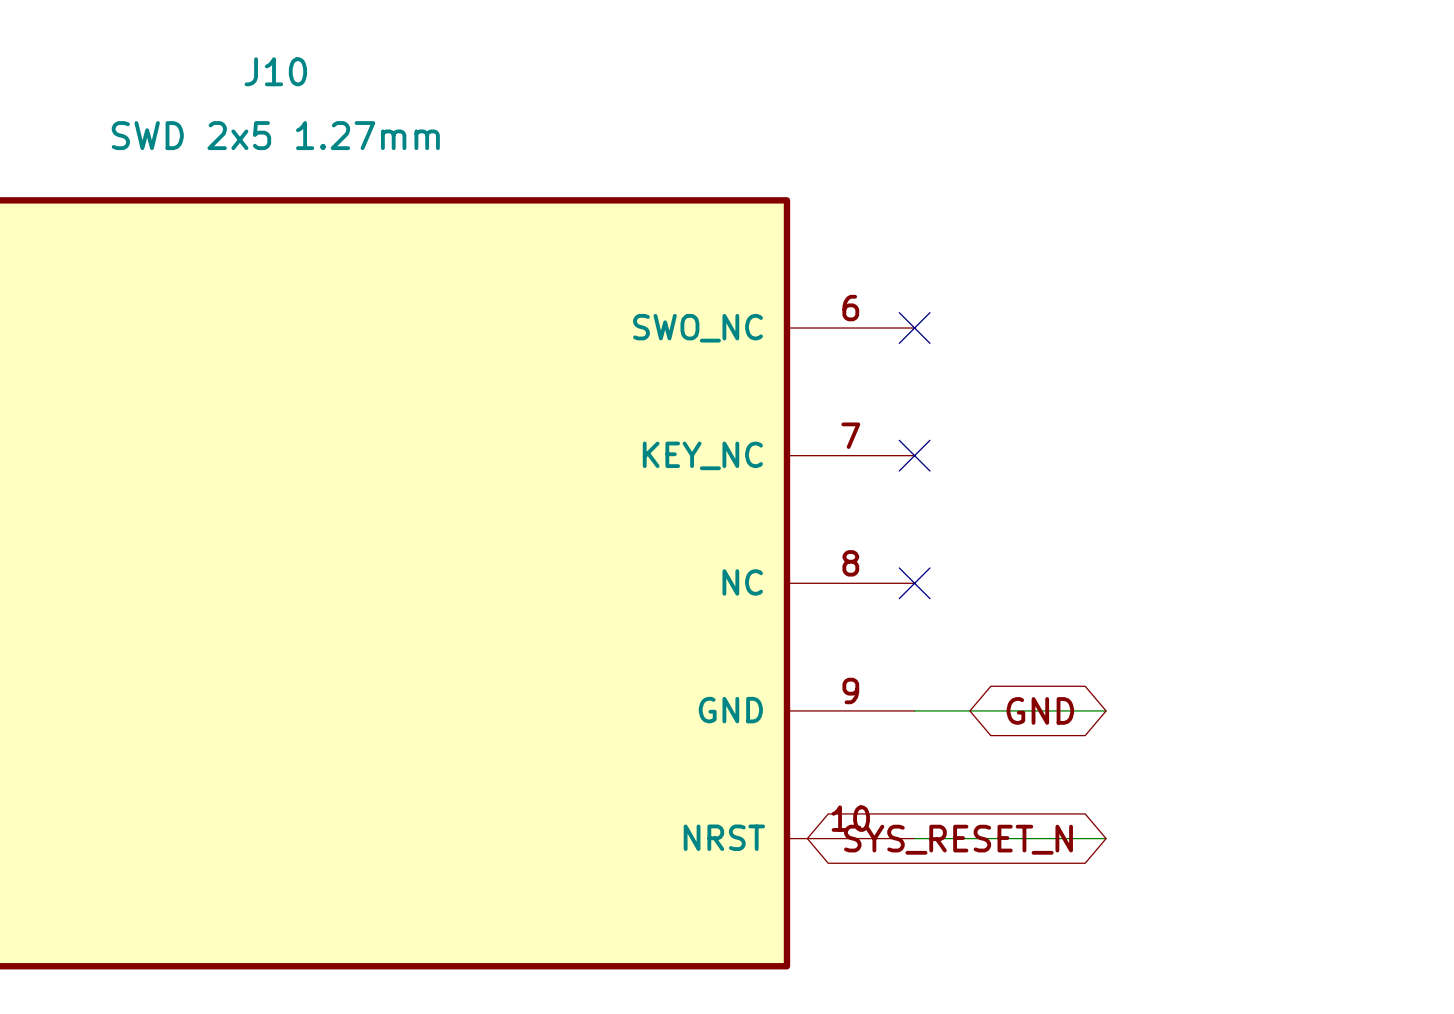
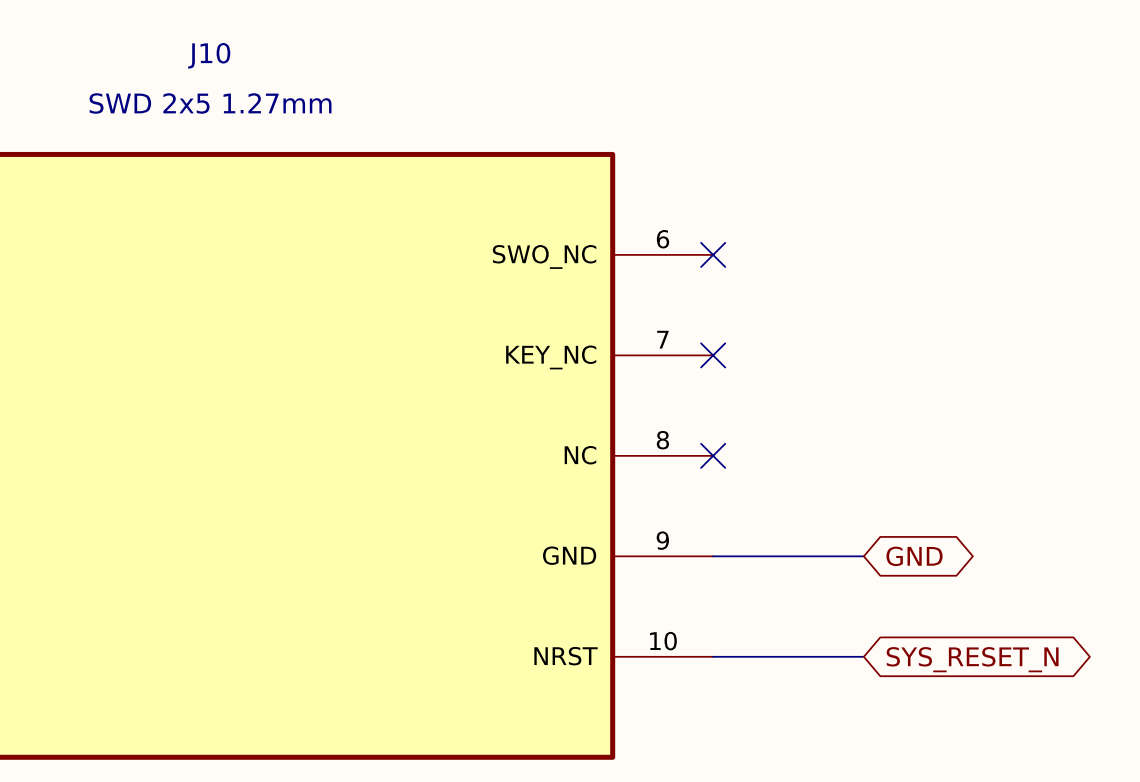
global label rotation: 0° (1040, 710) -> 180° (914, 556)
global label position: GND (1040, 710) -> GND (914, 556)
global label rotation: 0° (958, 839) -> 180° (972, 659)
global label position: SYS_RESET_N (958, 839) -> SYS_RESET_N (972, 659)

